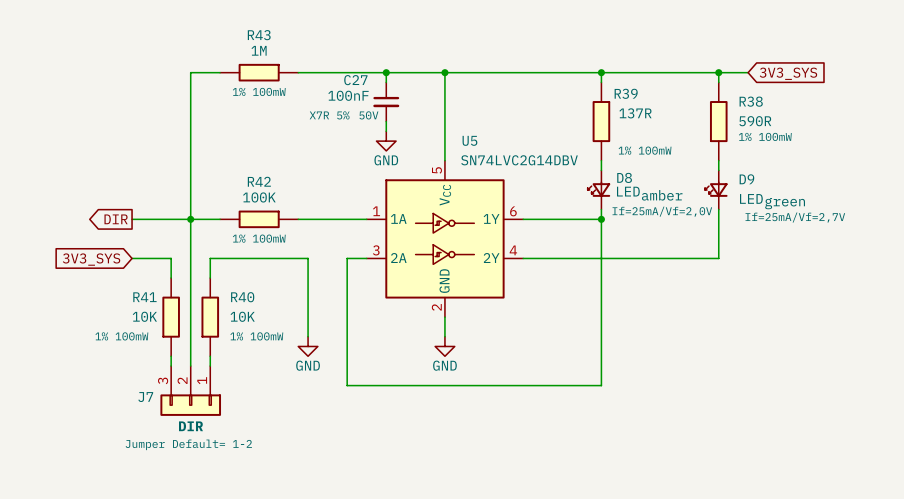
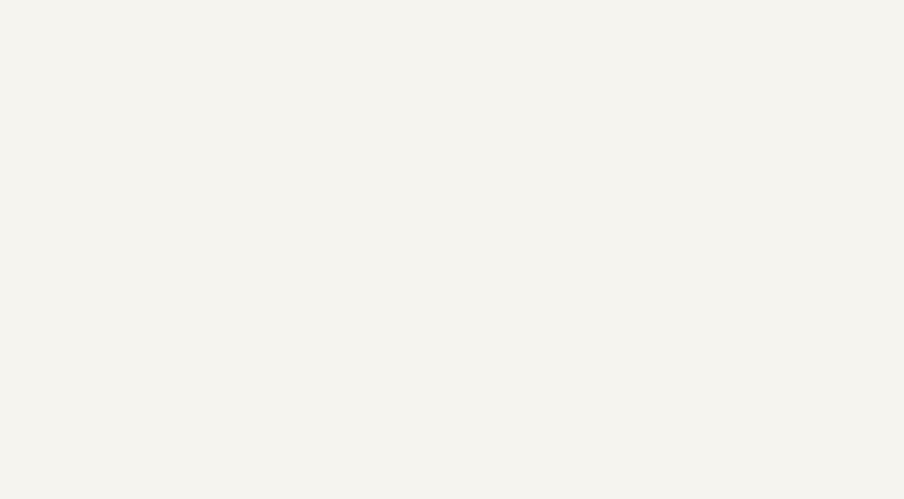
wire: (220, 72) (190, 72) (190, 366) -> none
R43: 1M (259, 72) -> none
wire: (298, 72) (748, 72) -> none
wire: (386, 72) (386, 82) -> none
junction: (386, 72) -> none
wire: (444, 72) (444, 160) -> none
junction: (444, 72) -> none
wire: (601, 72) (601, 82) -> none
junction: (601, 72) -> none
wire: (718, 72) (718, 82) -> none
junction: (718, 72) -> none
global label: 3V3_SYS (788, 73) -> none
C27: 100nF (386, 102) -> none
wire: (386, 121) (386, 131) -> none
R39: 137R (601, 121) -> none
R38: 590R (718, 121) -> none
power symbol: GND (386, 141) -> none
wire: (601, 160) (601, 170) -> none
wire: (718, 160) (718, 170) -> none
D8: LED (598, 190) -> none
D9: LED (716, 190) -> none
wire: (601, 209) (601, 385) (347, 385) (347, 258) (366, 258) -> none
wire: (718, 209) (718, 258) (523, 258) -> none
global label: DIR (116, 219) -> none
wire: (132, 219) (220, 219) -> none
junction: (190, 219) -> none
R42: 100K (259, 219) -> none
wire: (298, 219) (366, 219) -> none
wire: (523, 219) (601, 219) -> none
junction: (601, 219) -> none
U5: SN74LVC2G14DBV (444, 238) -> none
wire: (132, 258) (171, 258) (171, 278) -> none
global label: 3V3_SYS (91, 259) -> none
wire: (210, 278) (210, 258) (308, 258) (308, 336) -> none
R41: 10K (171, 317) -> none
R40: 10K (210, 317) -> none
wire: (444, 317) (444, 336) -> none
power symbol: GND (308, 346) -> none
power symbol: GND (444, 346) -> none
wire: (171, 356) (171, 366) -> none
wire: (210, 356) (210, 366) -> none
J7: DIR (190, 390) -> none

